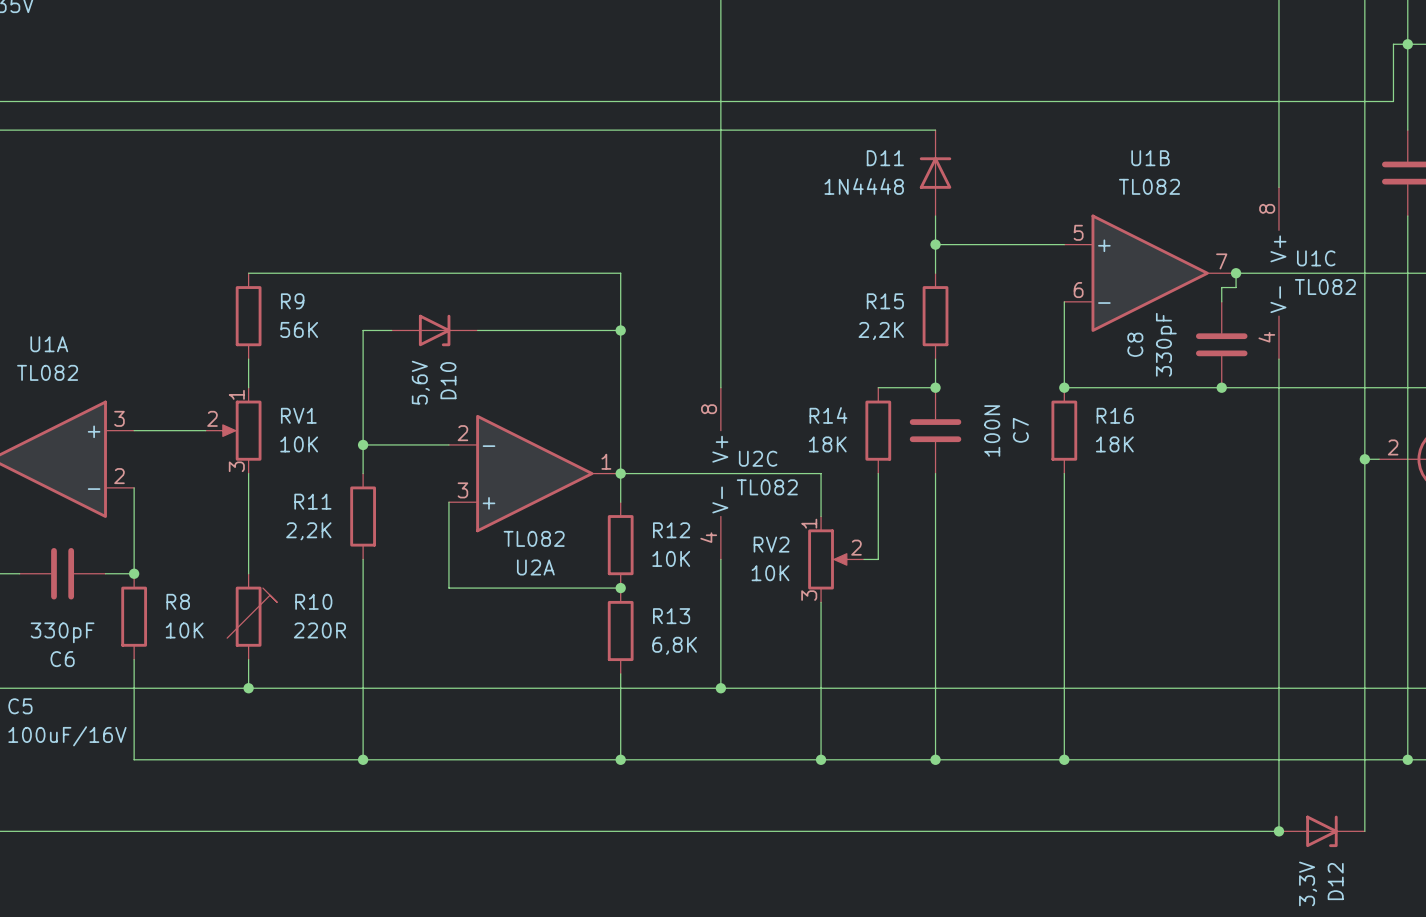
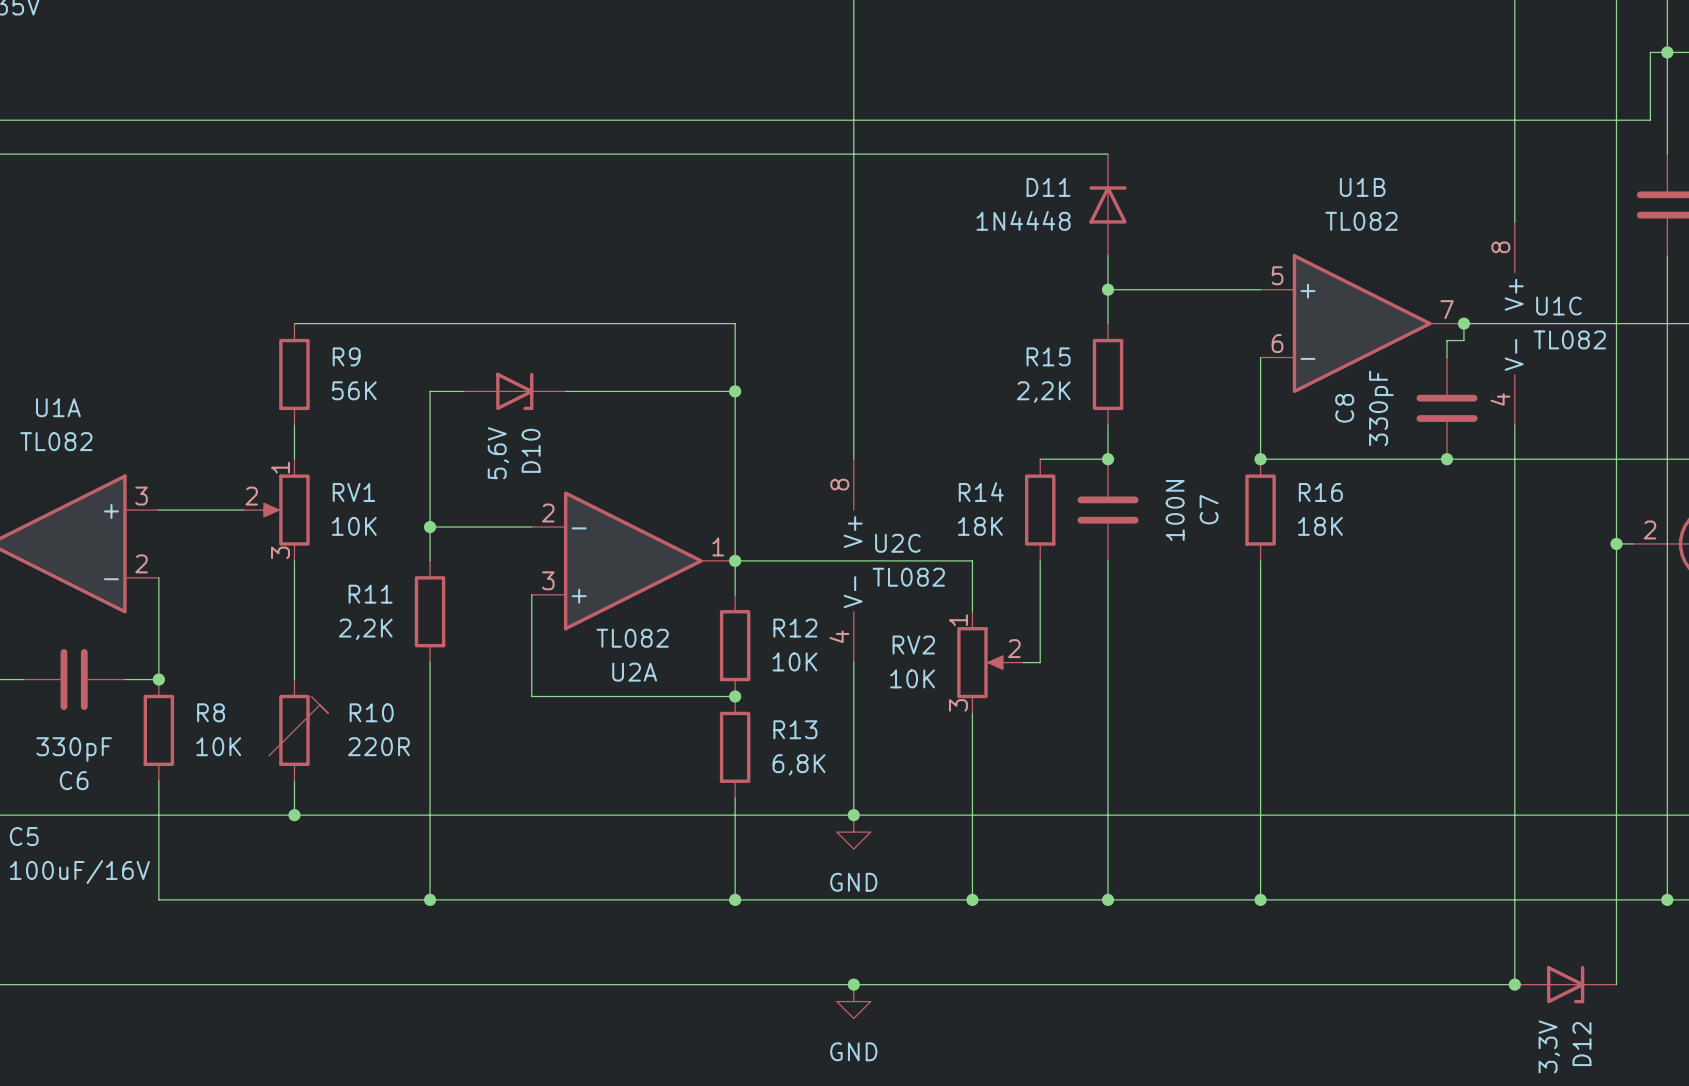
power symbol: none -> GND (853, 832)
junction: none -> (853, 984)
power symbol: none -> GND (853, 1001)

